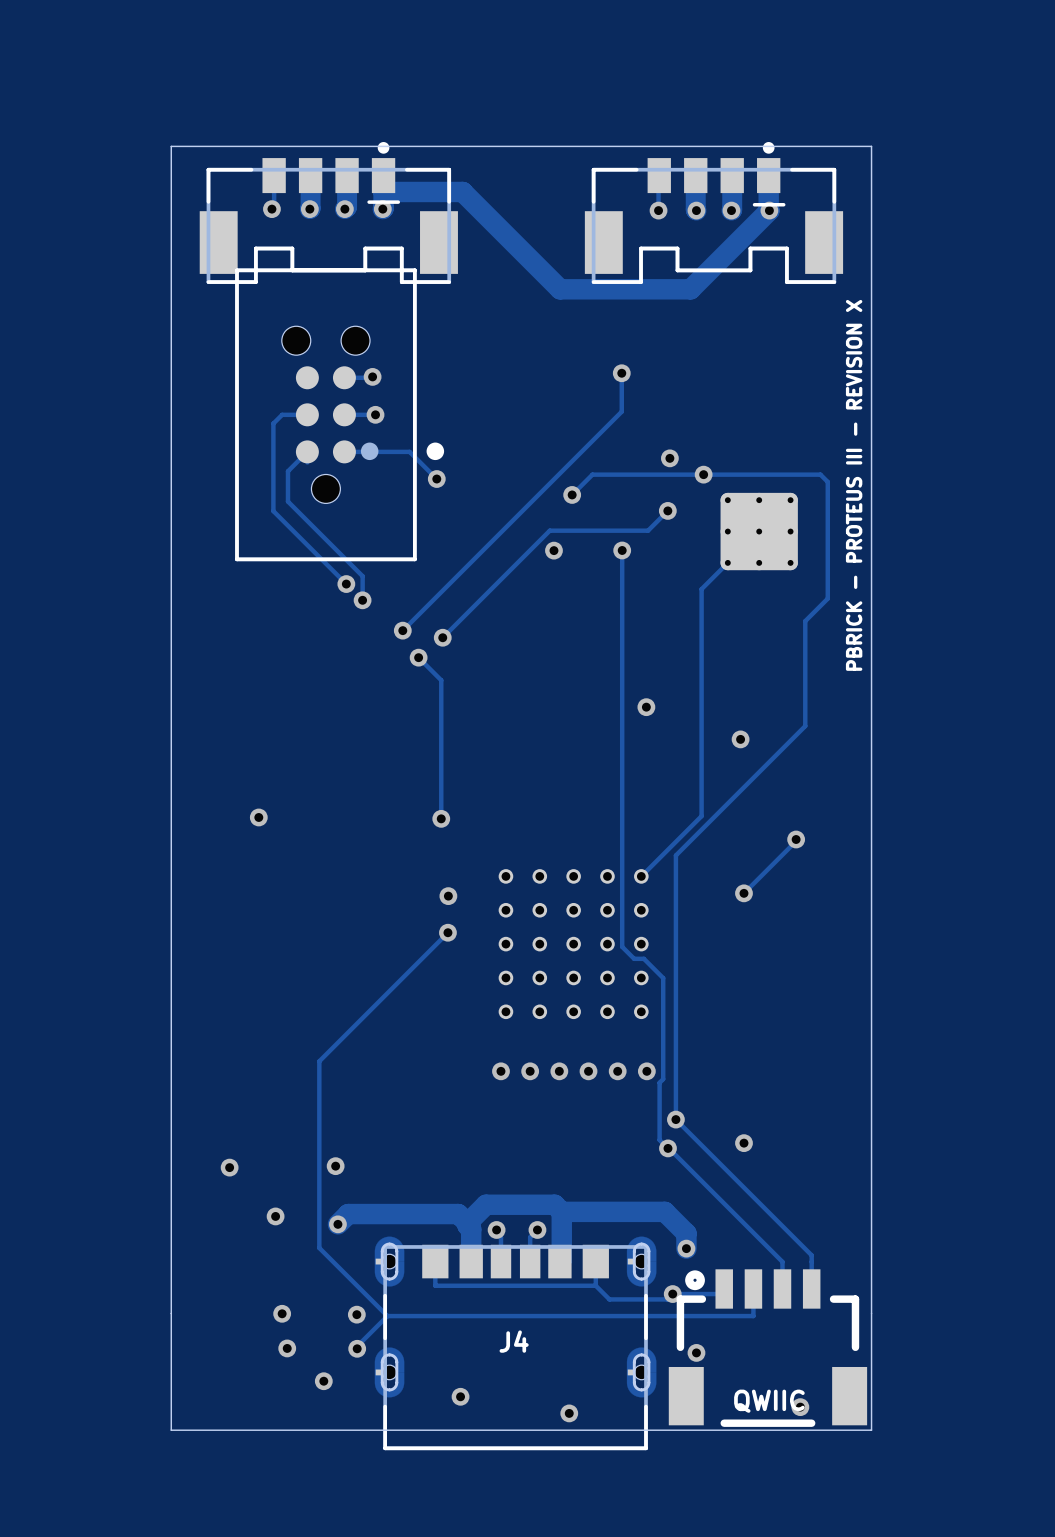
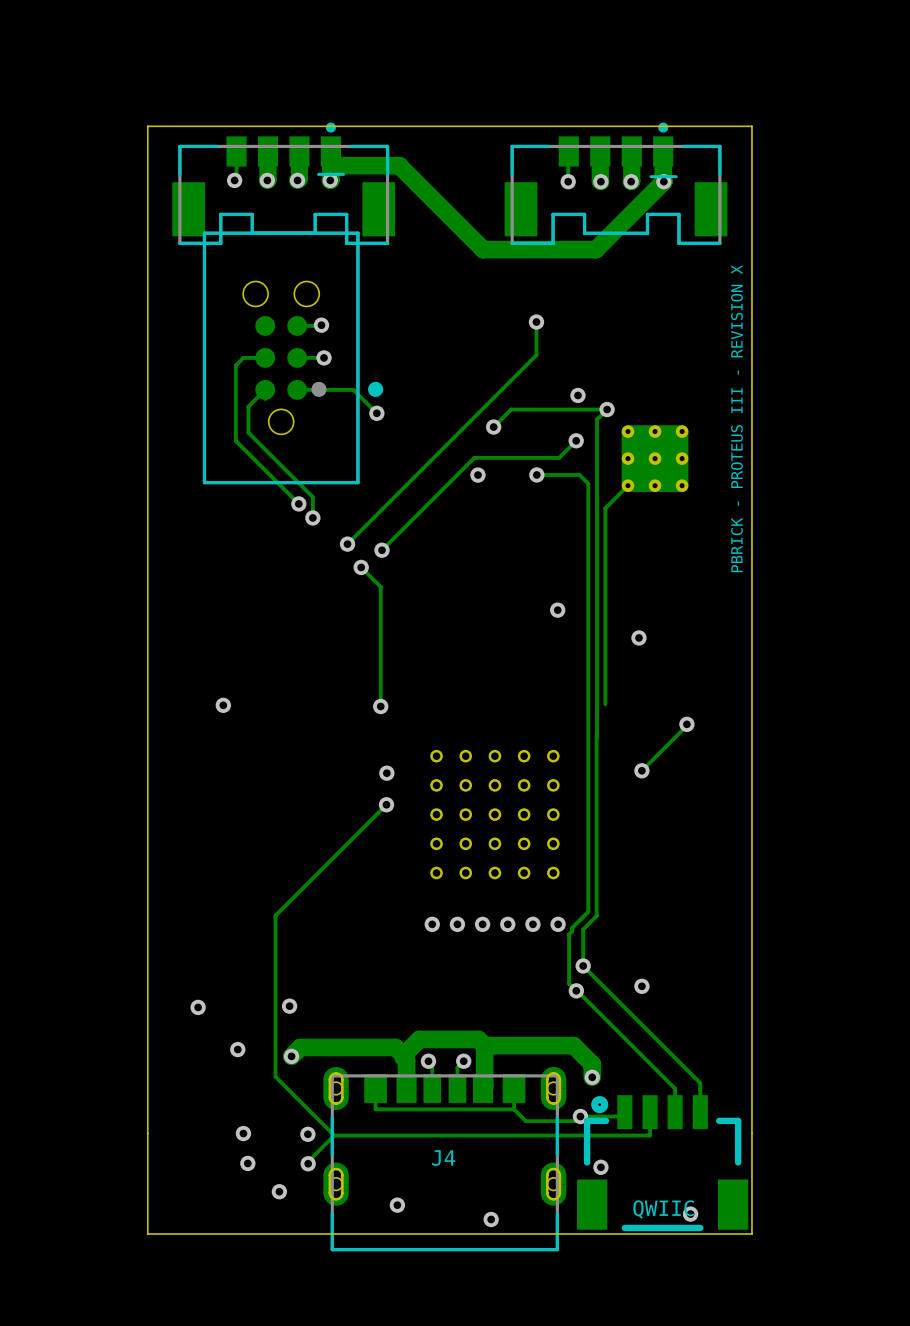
track: (703, 474) (820, 474) (827, 481) (827, 598) (805, 621) (805, 726) (675, 855) (675, 1077) -> (607, 409) (597, 419) (596, 737)
track: (622, 550) (622, 946) (634, 958) (643, 958) (663, 978) (663, 1075) -> (537, 476) (536, 474) (579, 474) (588, 483) (588, 911) (572, 927)
track: (701, 816) (641, 876) -> none
track: none -> (596, 733) (596, 916) (583, 929)

